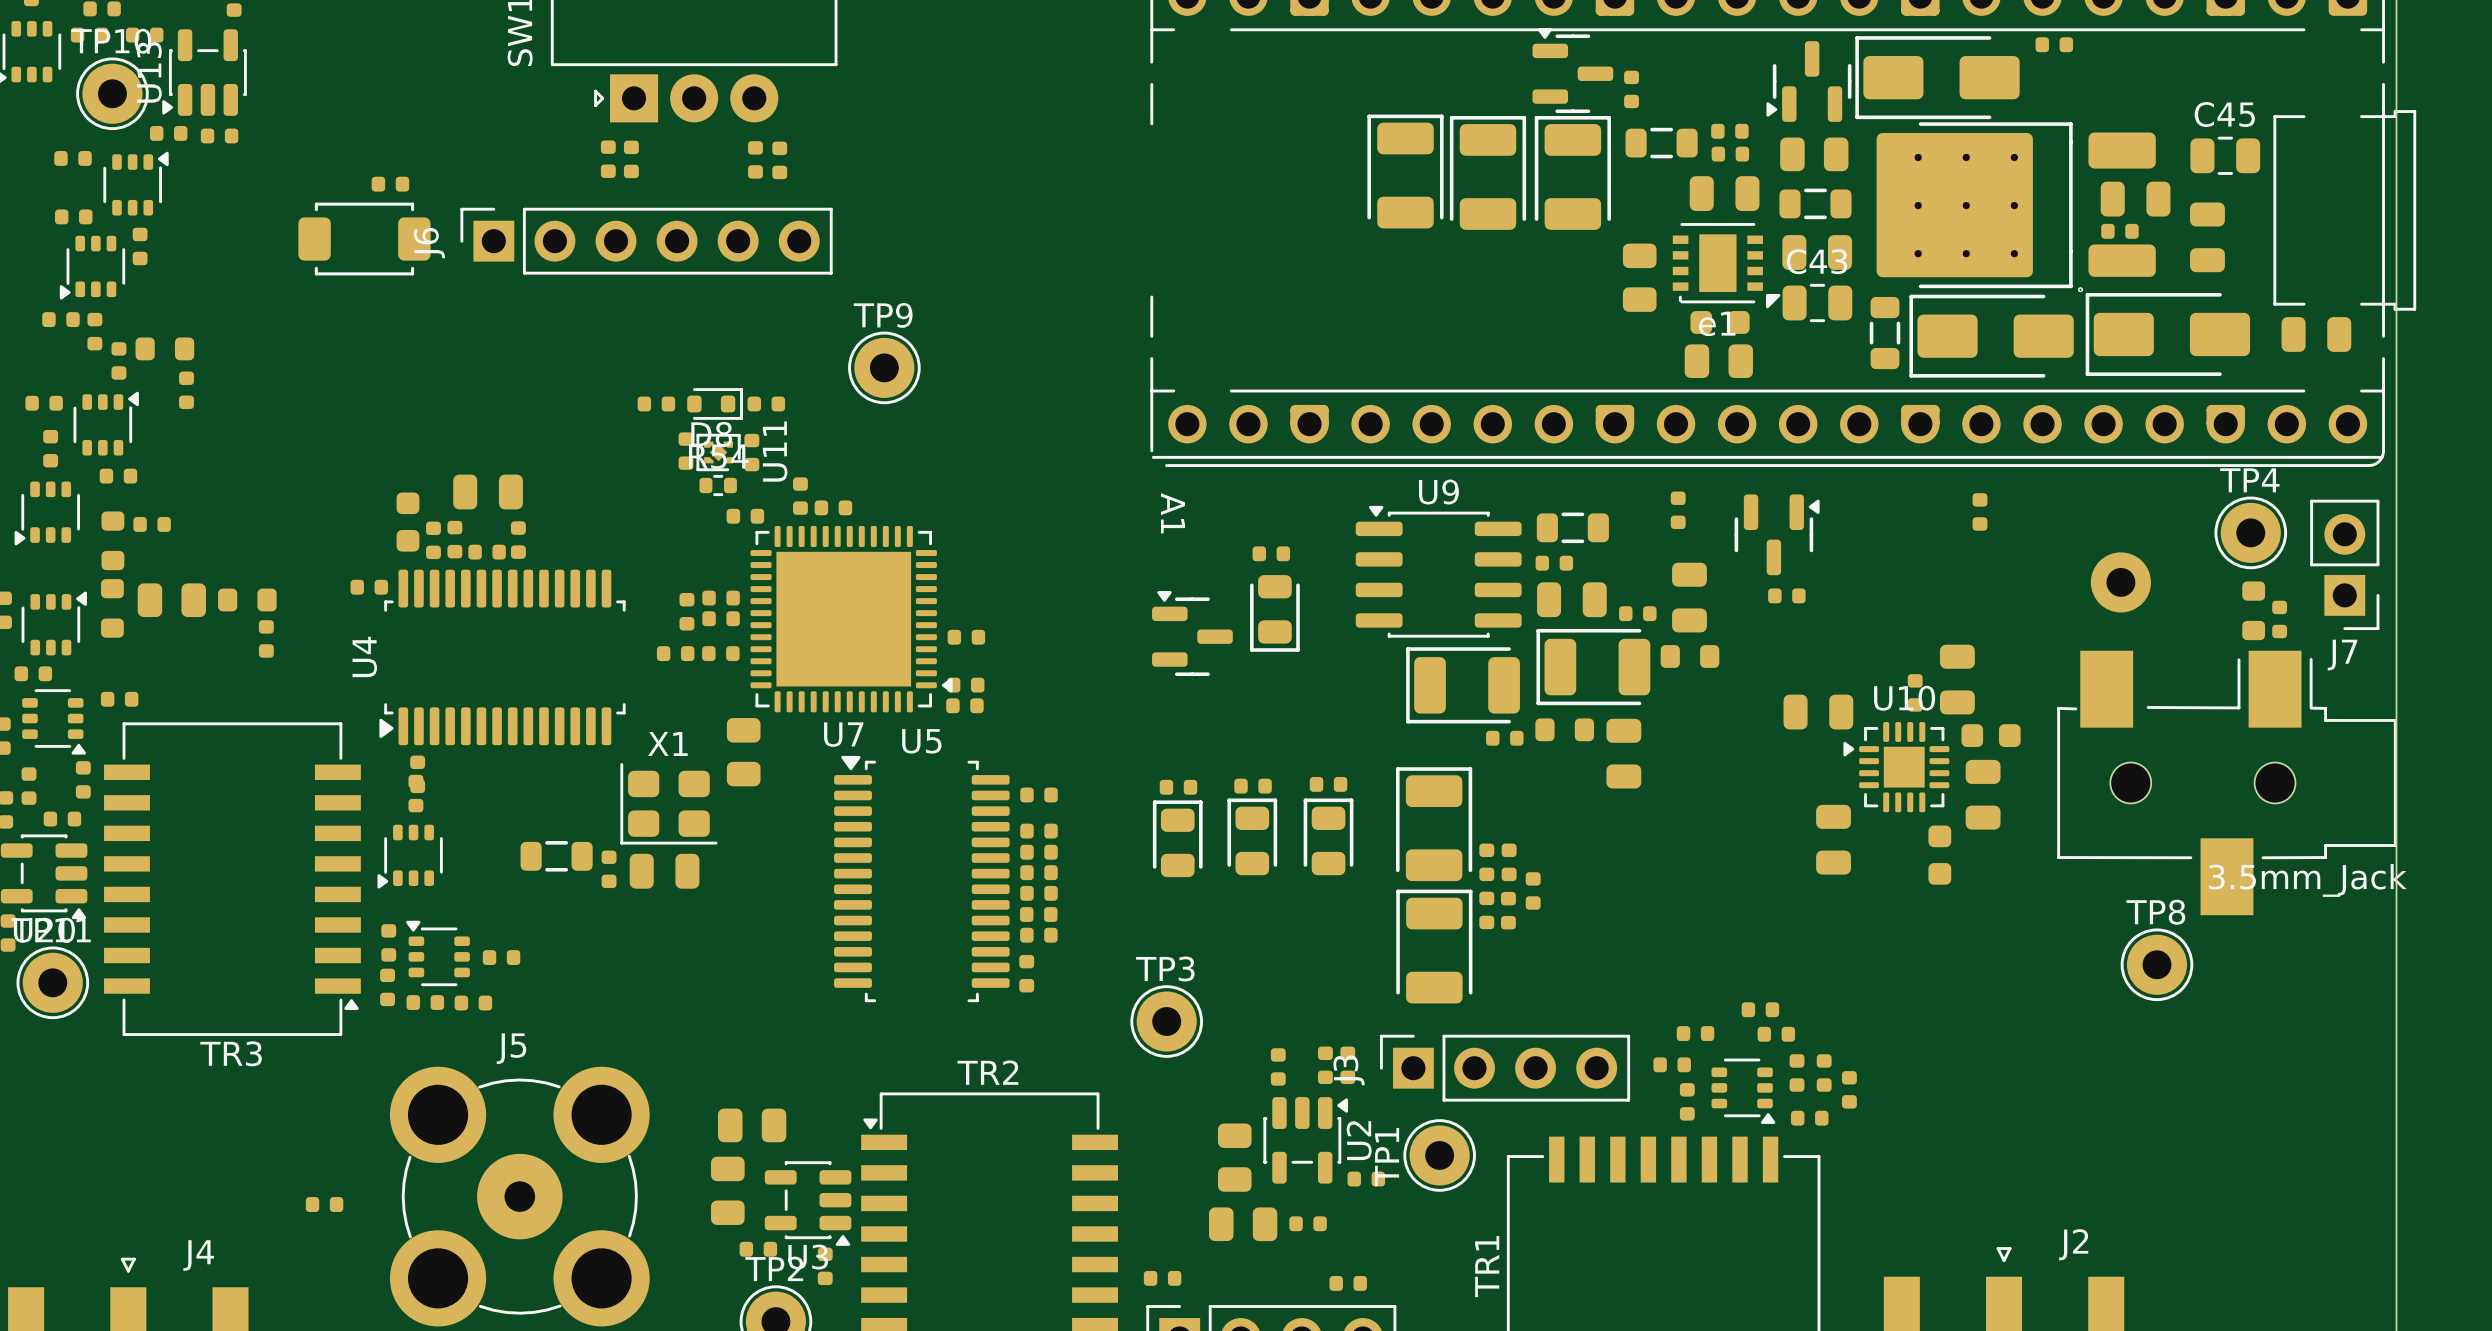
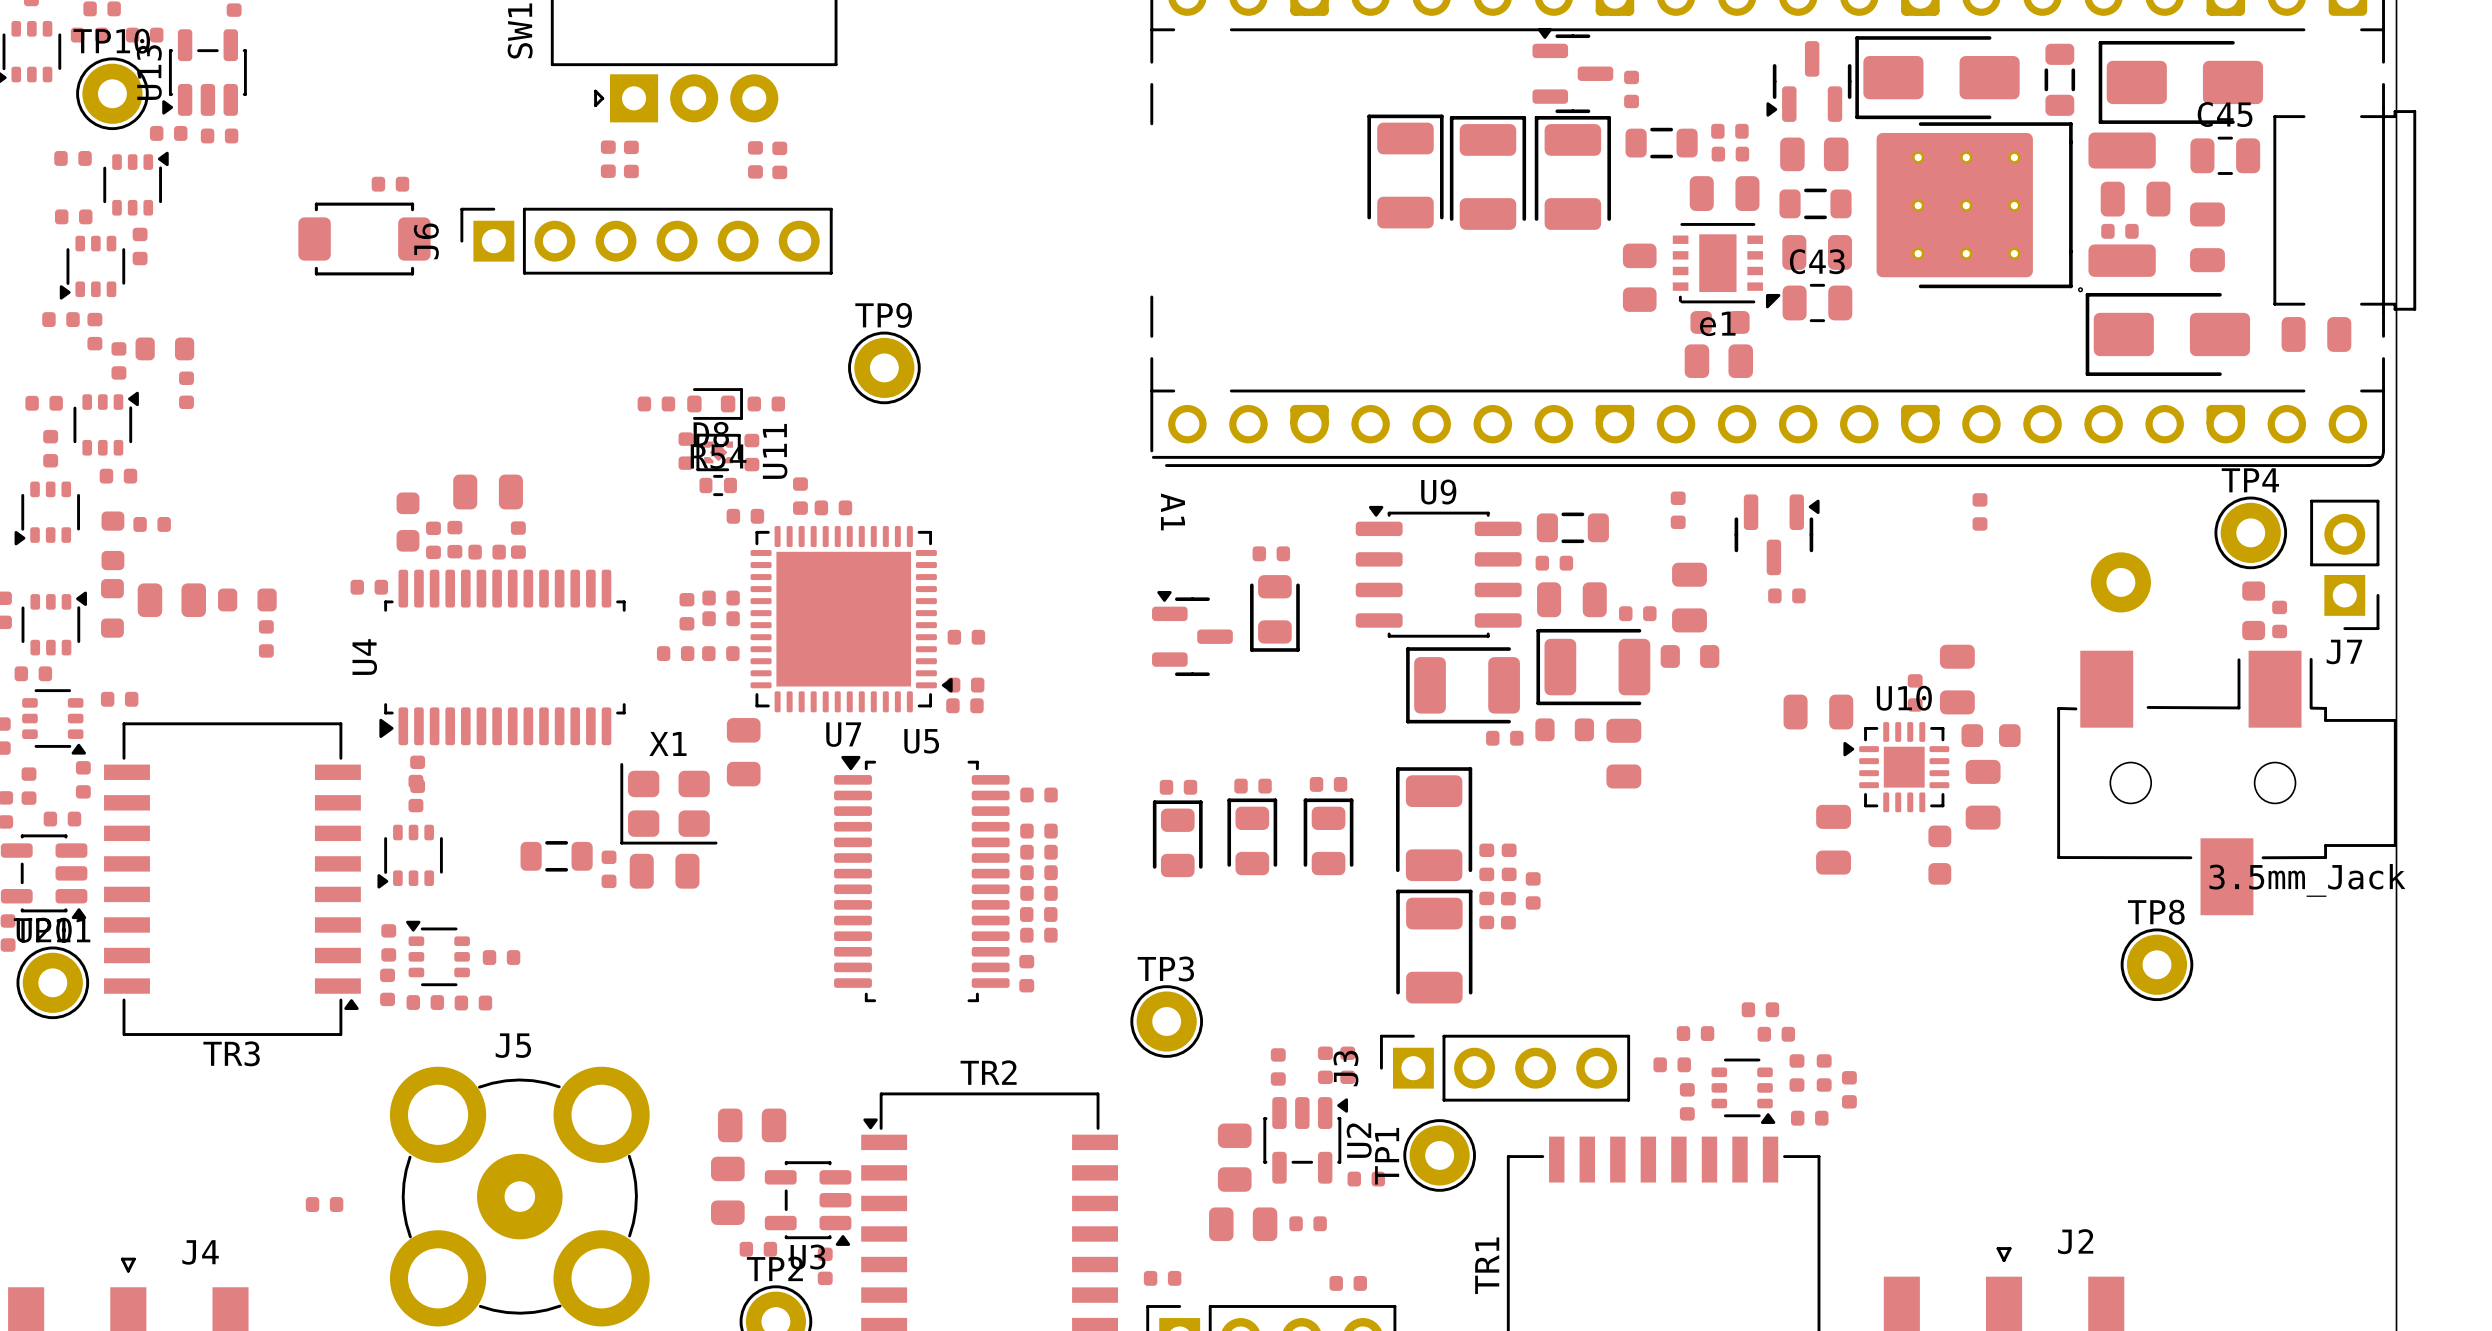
part: (2054, 44) -> none
part position: (1885, 333) -> (2059, 79)
part position: (1991, 336) -> (2180, 82)

